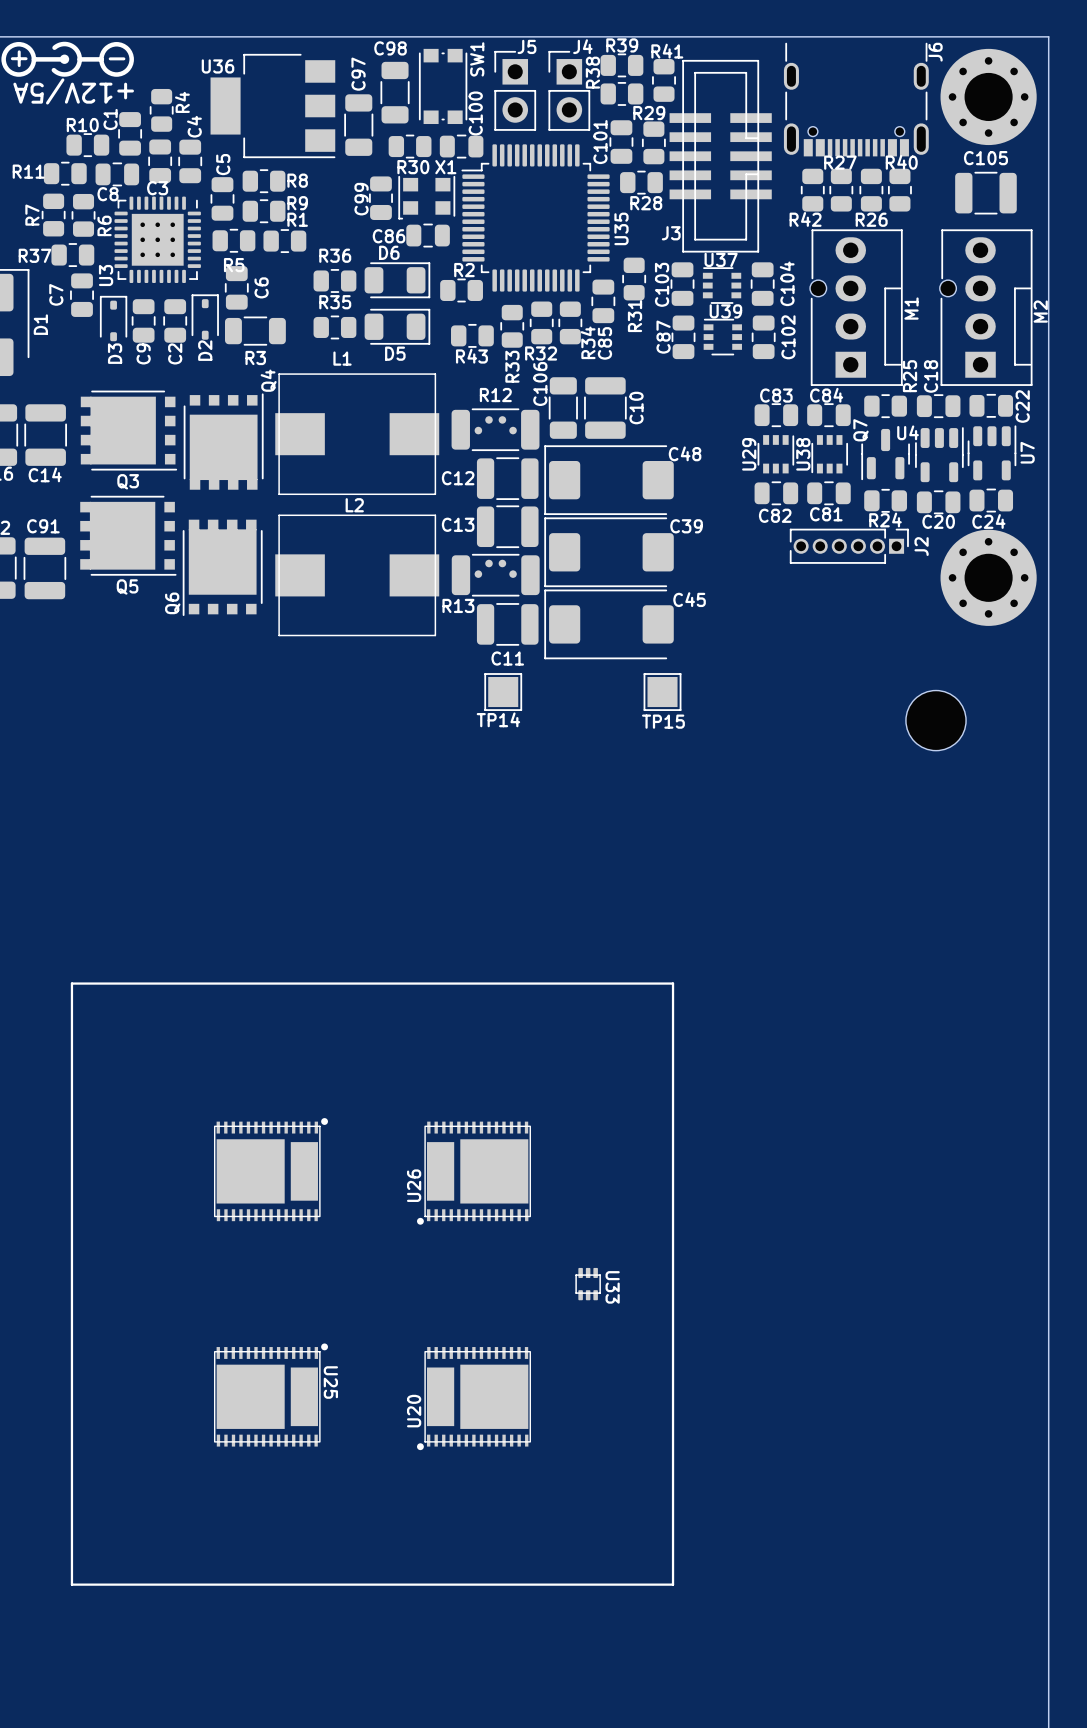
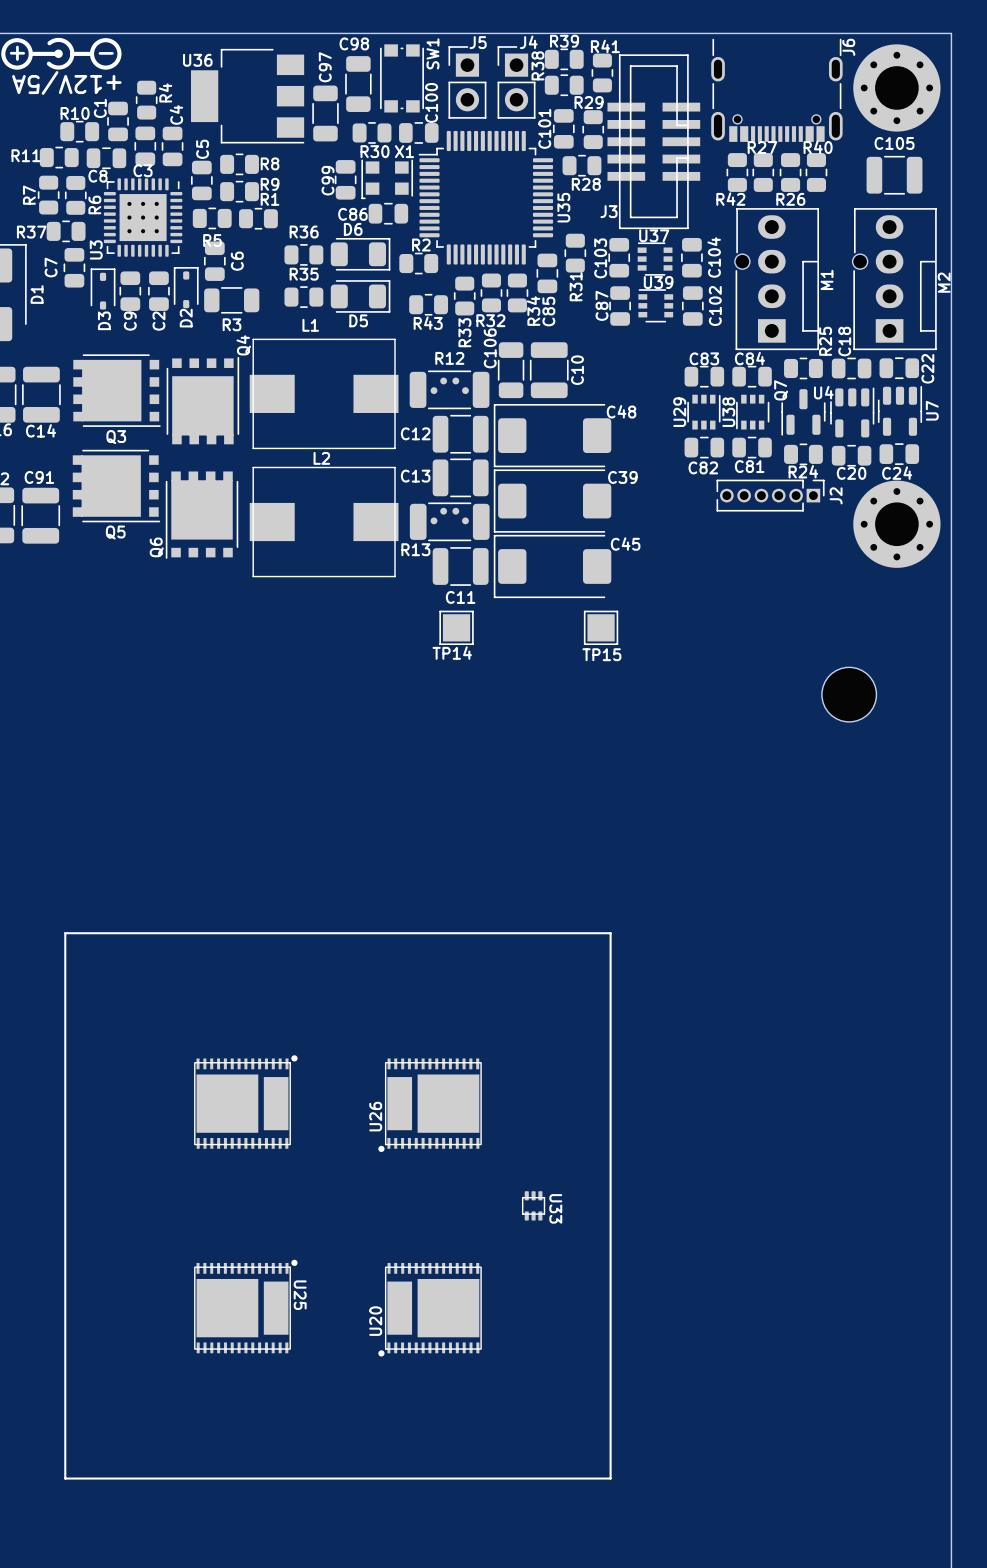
part position: (936, 720) -> (849, 694)
line: (71, 1028) (71, 983) (673, 983) (673, 1028) -> (65, 933) (610, 933)
part position: (271, 1169) -> (246, 1102)
U26 position: (473, 1173) -> (429, 1105)
U33 position: (588, 1284) -> (533, 1205)
U25 position: (271, 1395) -> (246, 1306)
U20 position: (473, 1398) -> (429, 1309)
line: (71, 1584) (673, 1584) -> (65, 1437) (65, 1478) (610, 1478) (610, 1437)

